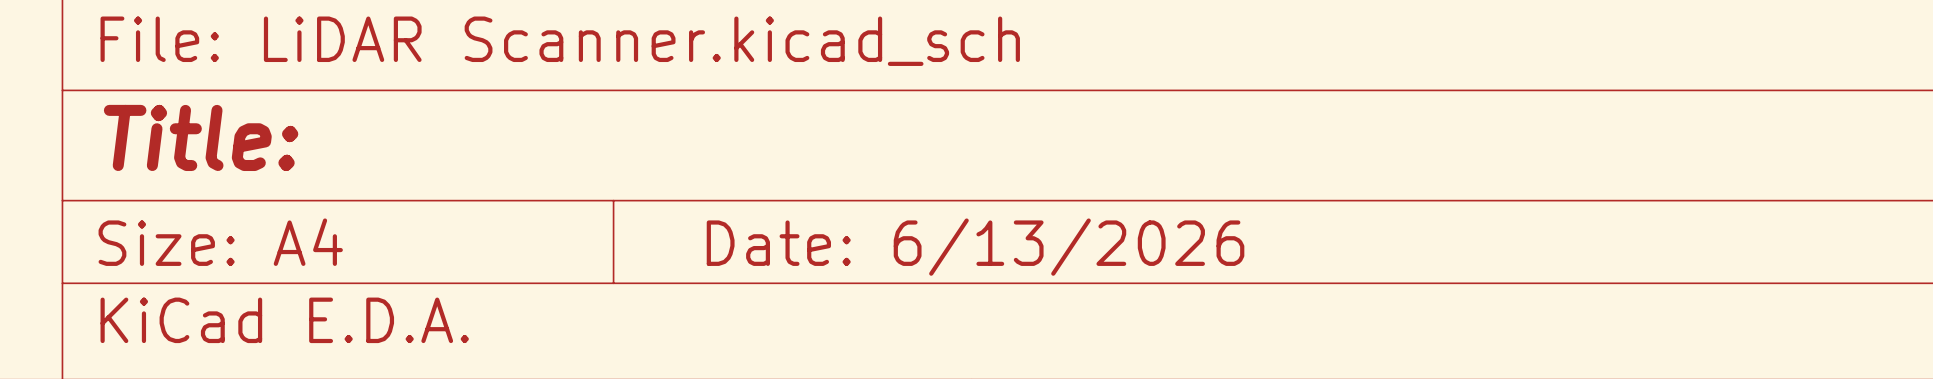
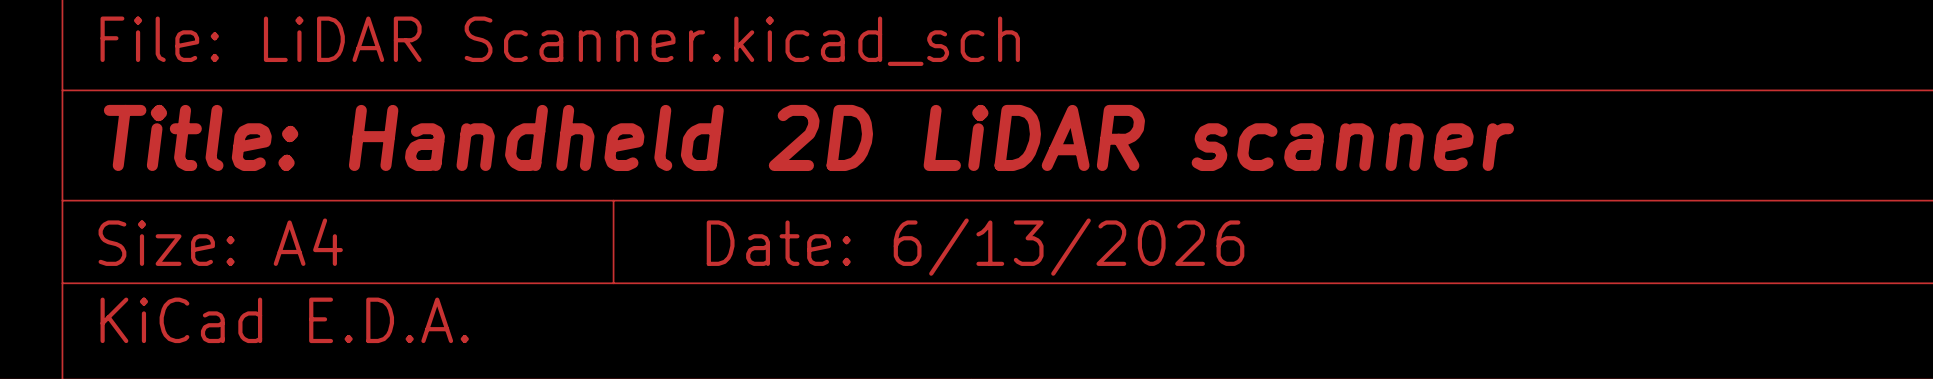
title block: Title: (201, 137) -> Title: Handheld 2D LiDAR scanner (808, 137)

